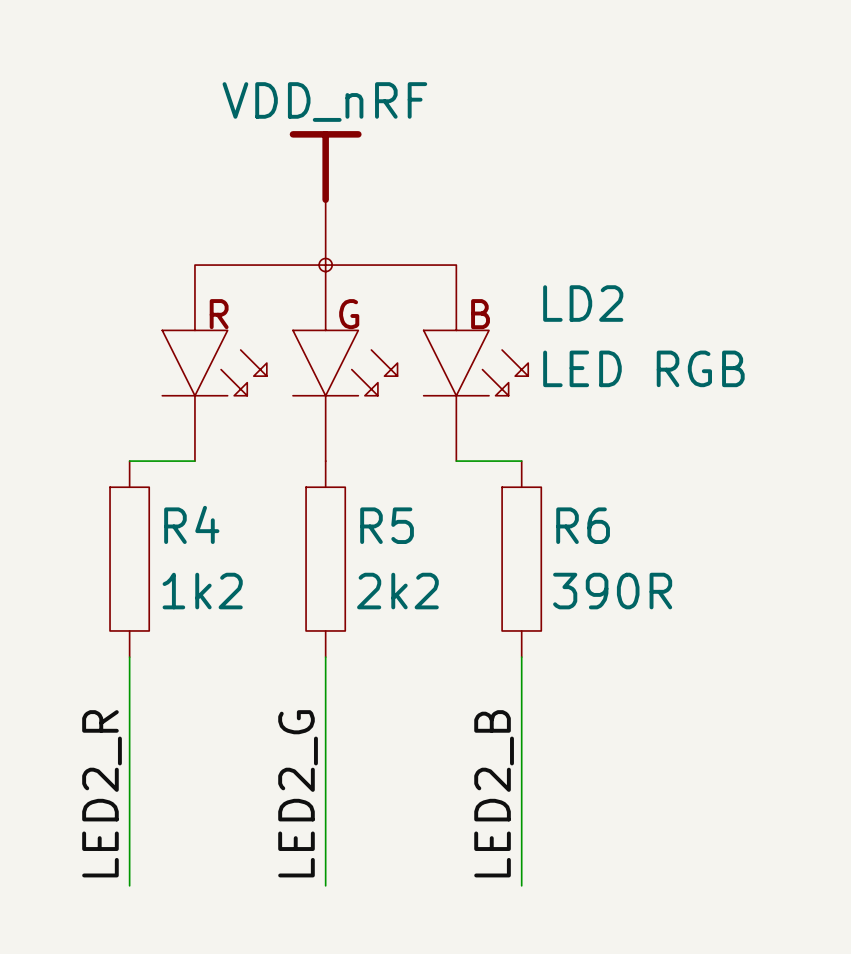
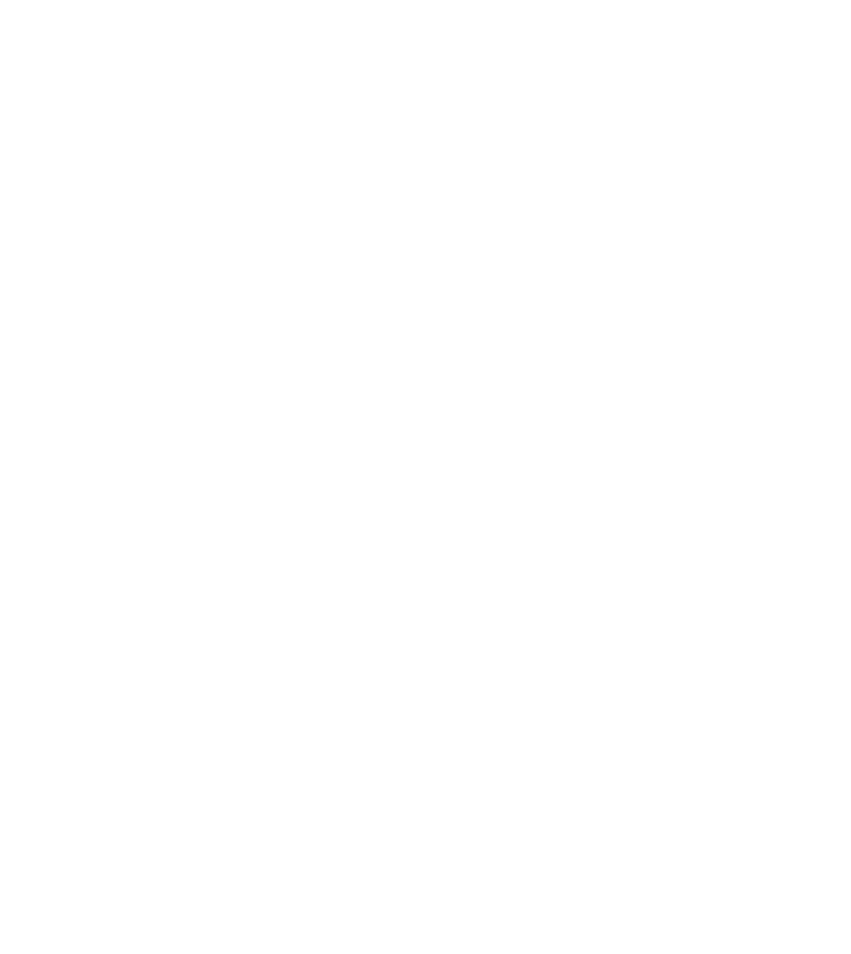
power symbol: VDD_nRF (325, 167) -> none
LD2: LED RGB (345, 330) -> none
wire: (129, 461) (194, 461) -> none
wire: (456, 461) (521, 461) -> none
R4: 1k2 (129, 559) -> none
R5: 2k2 (325, 559) -> none
R6: 390R (521, 559) -> none
wire: (129, 657) (129, 885) -> none
wire: (325, 657) (325, 885) -> none
wire: (521, 657) (521, 885) -> none
label: LED2_R (102, 793) -> none
label: LED2_G (298, 793) -> none
label: LED2_B (494, 793) -> none

